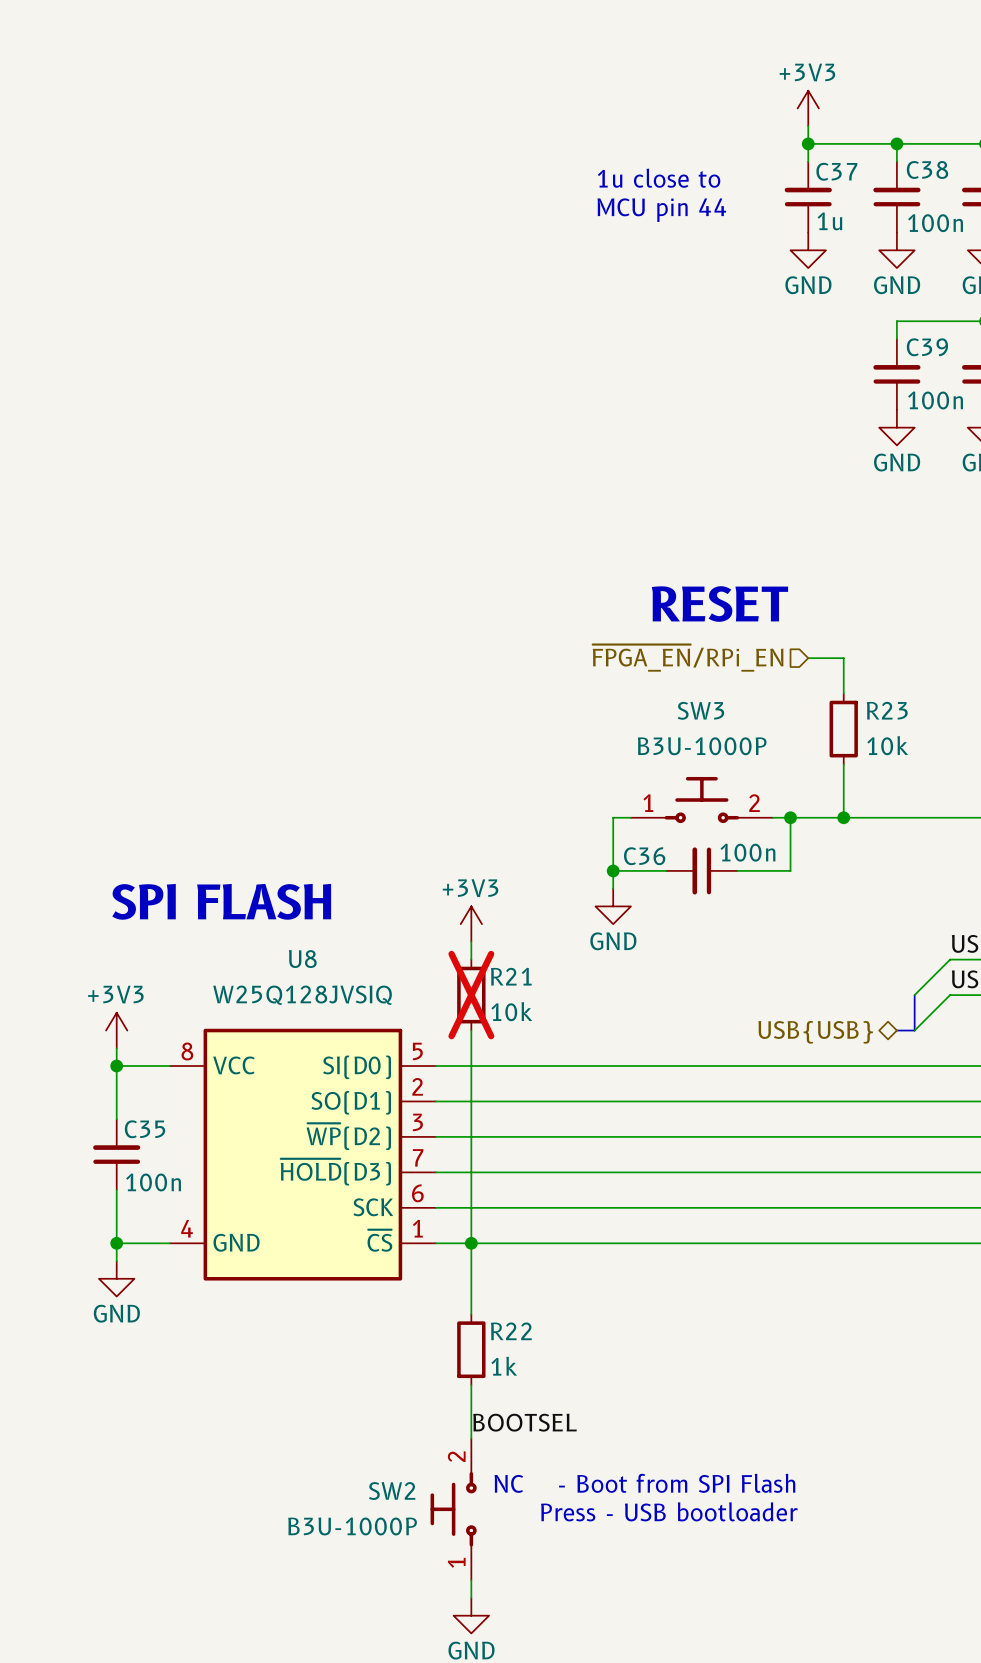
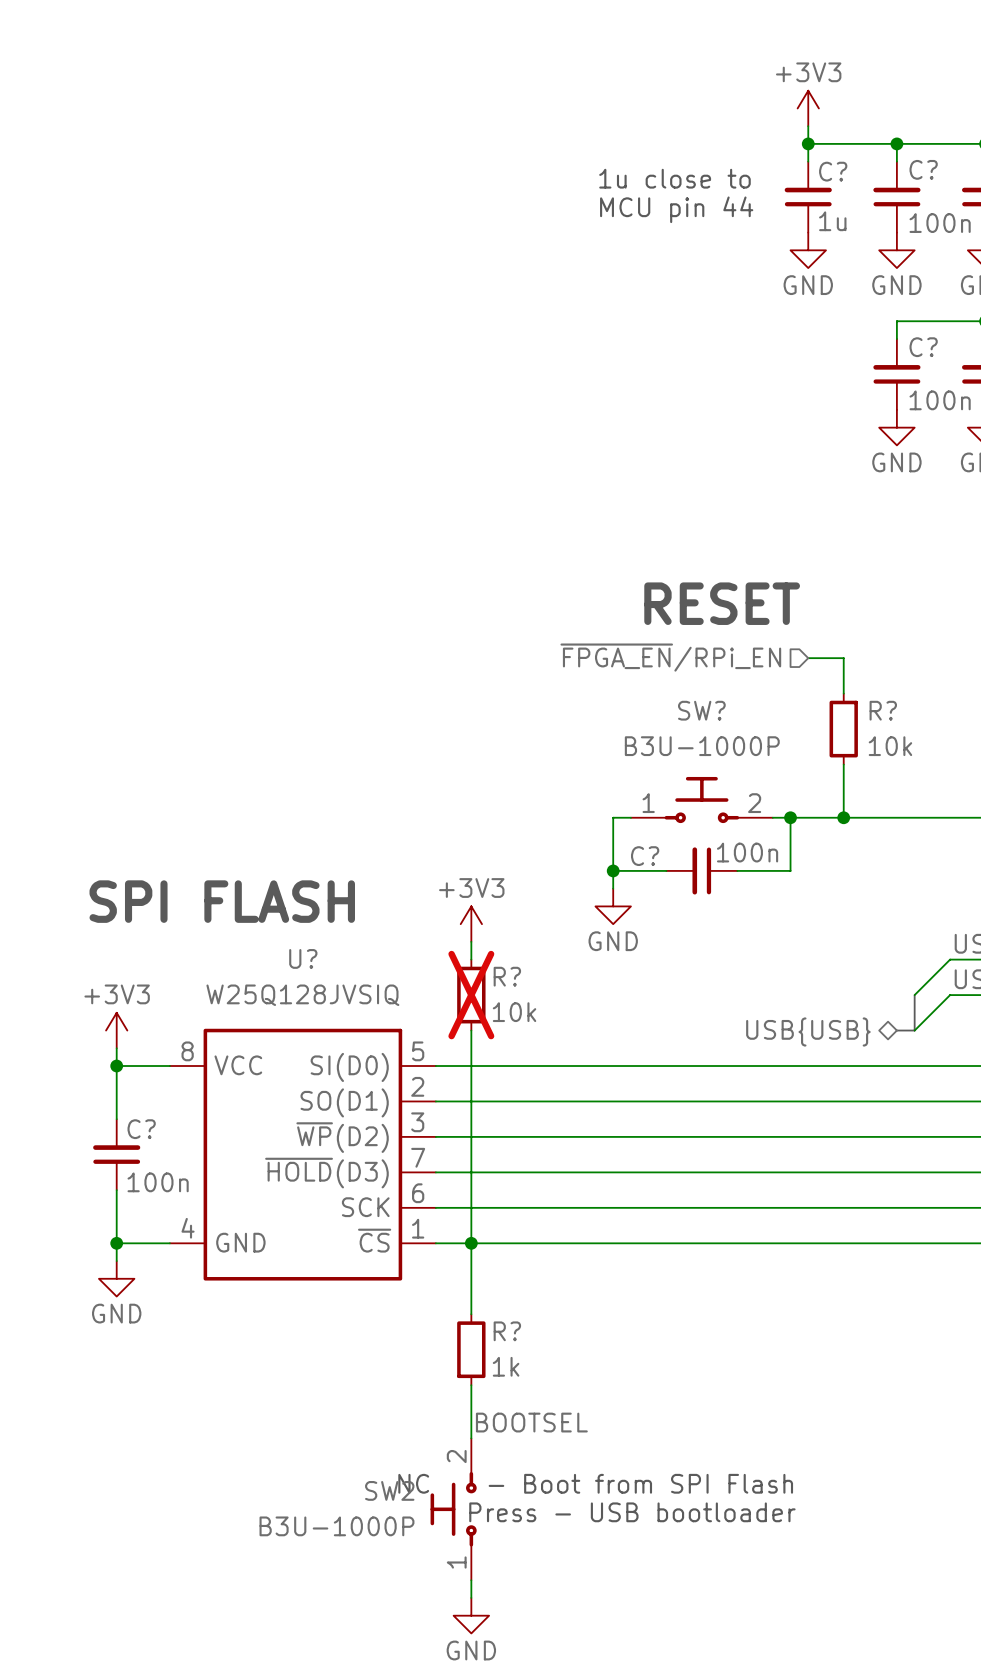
C38 name: C38 (927, 169) -> C? (923, 169)
C37 name: C37 (836, 171) -> C? (833, 171)
C39 name: C39 (927, 347) -> C? (923, 347)
SW3 name: SW3 (700, 710) -> SW? (701, 710)
R23 name: R23 (887, 710) -> R? (883, 710)
C36 name: C36 (644, 856) -> C? (645, 856)
U8 name: U8 (302, 959) -> U? (303, 958)
R21 name: R21 (511, 976) -> R? (507, 976)
C35 name: C35 (145, 1129) -> C? (141, 1129)
R22 name: R22 (511, 1331) -> R? (507, 1331)

